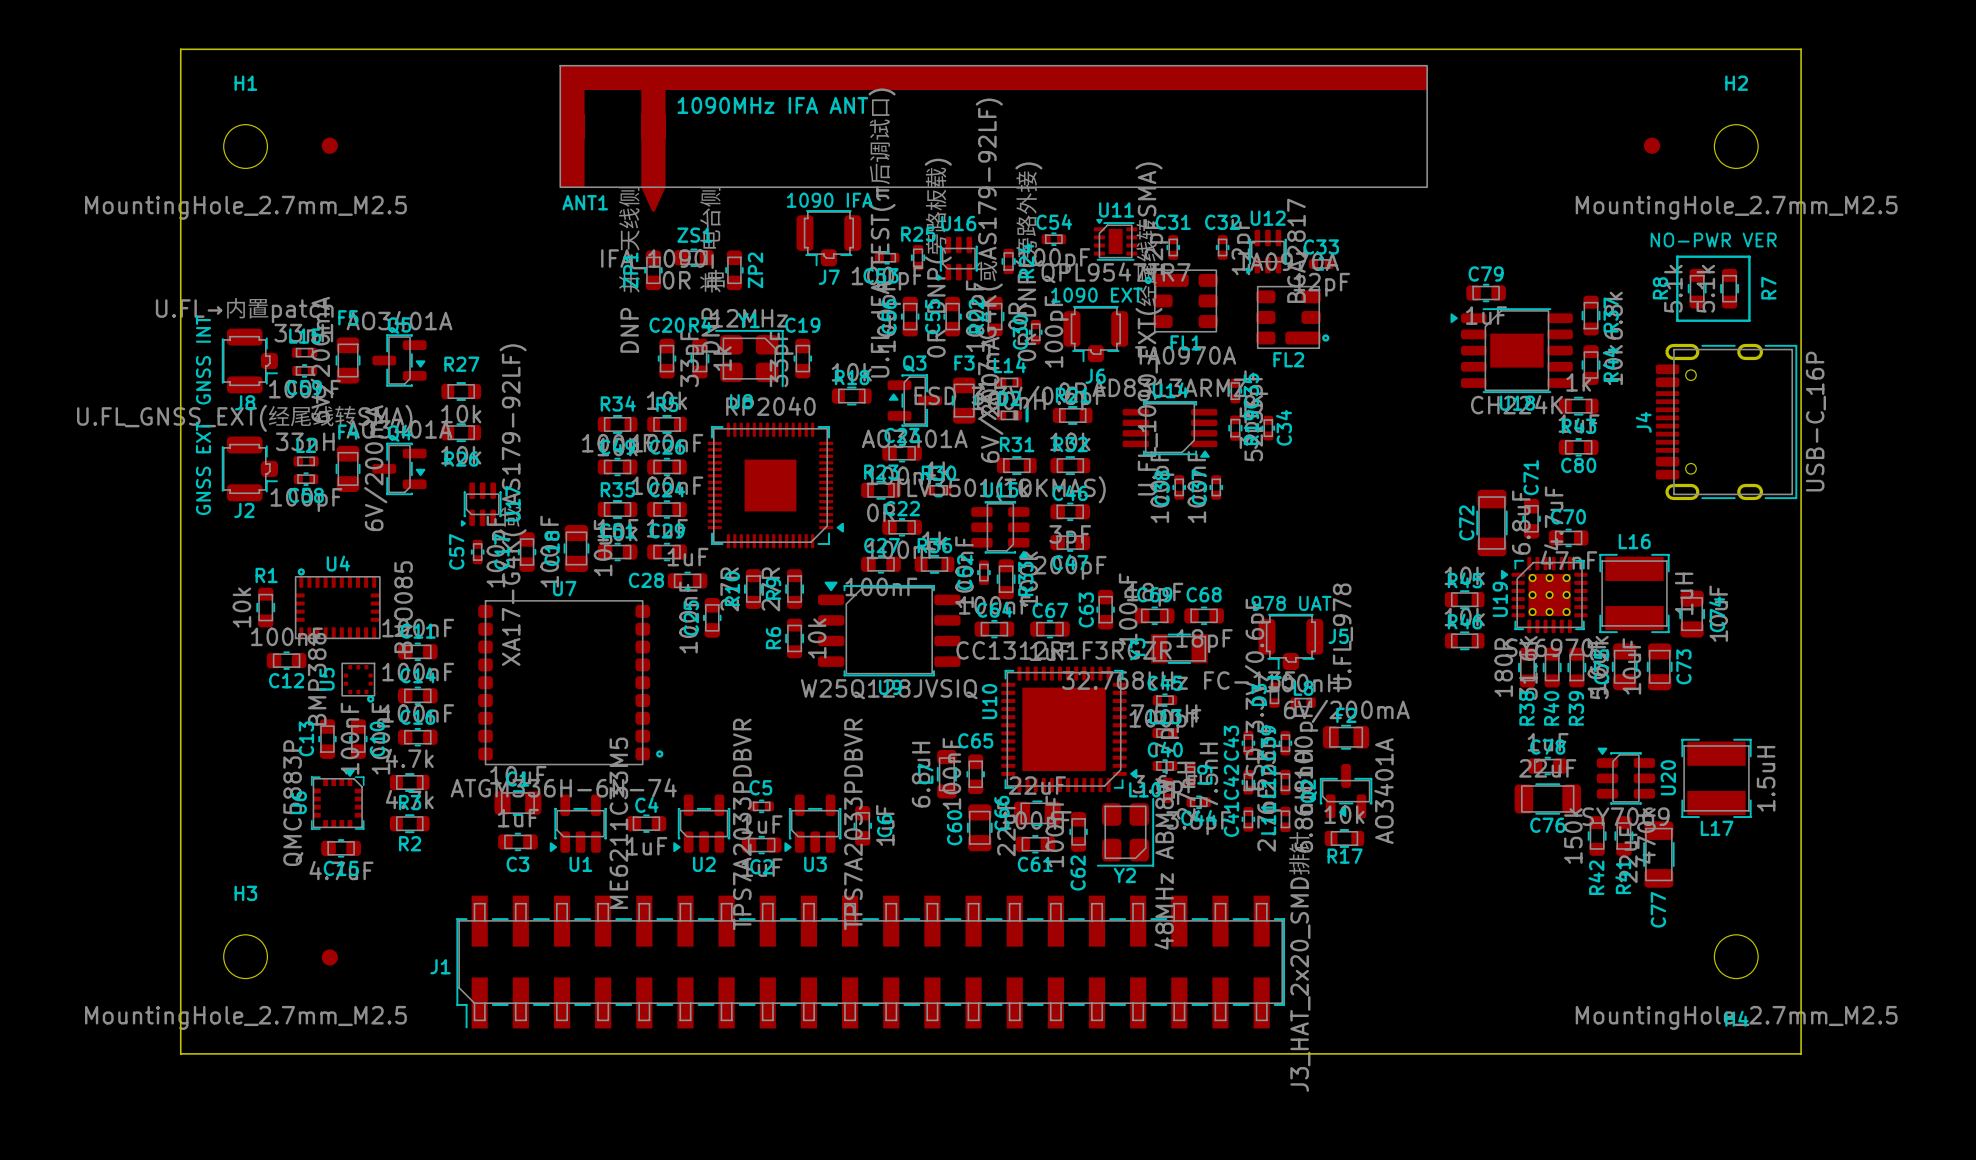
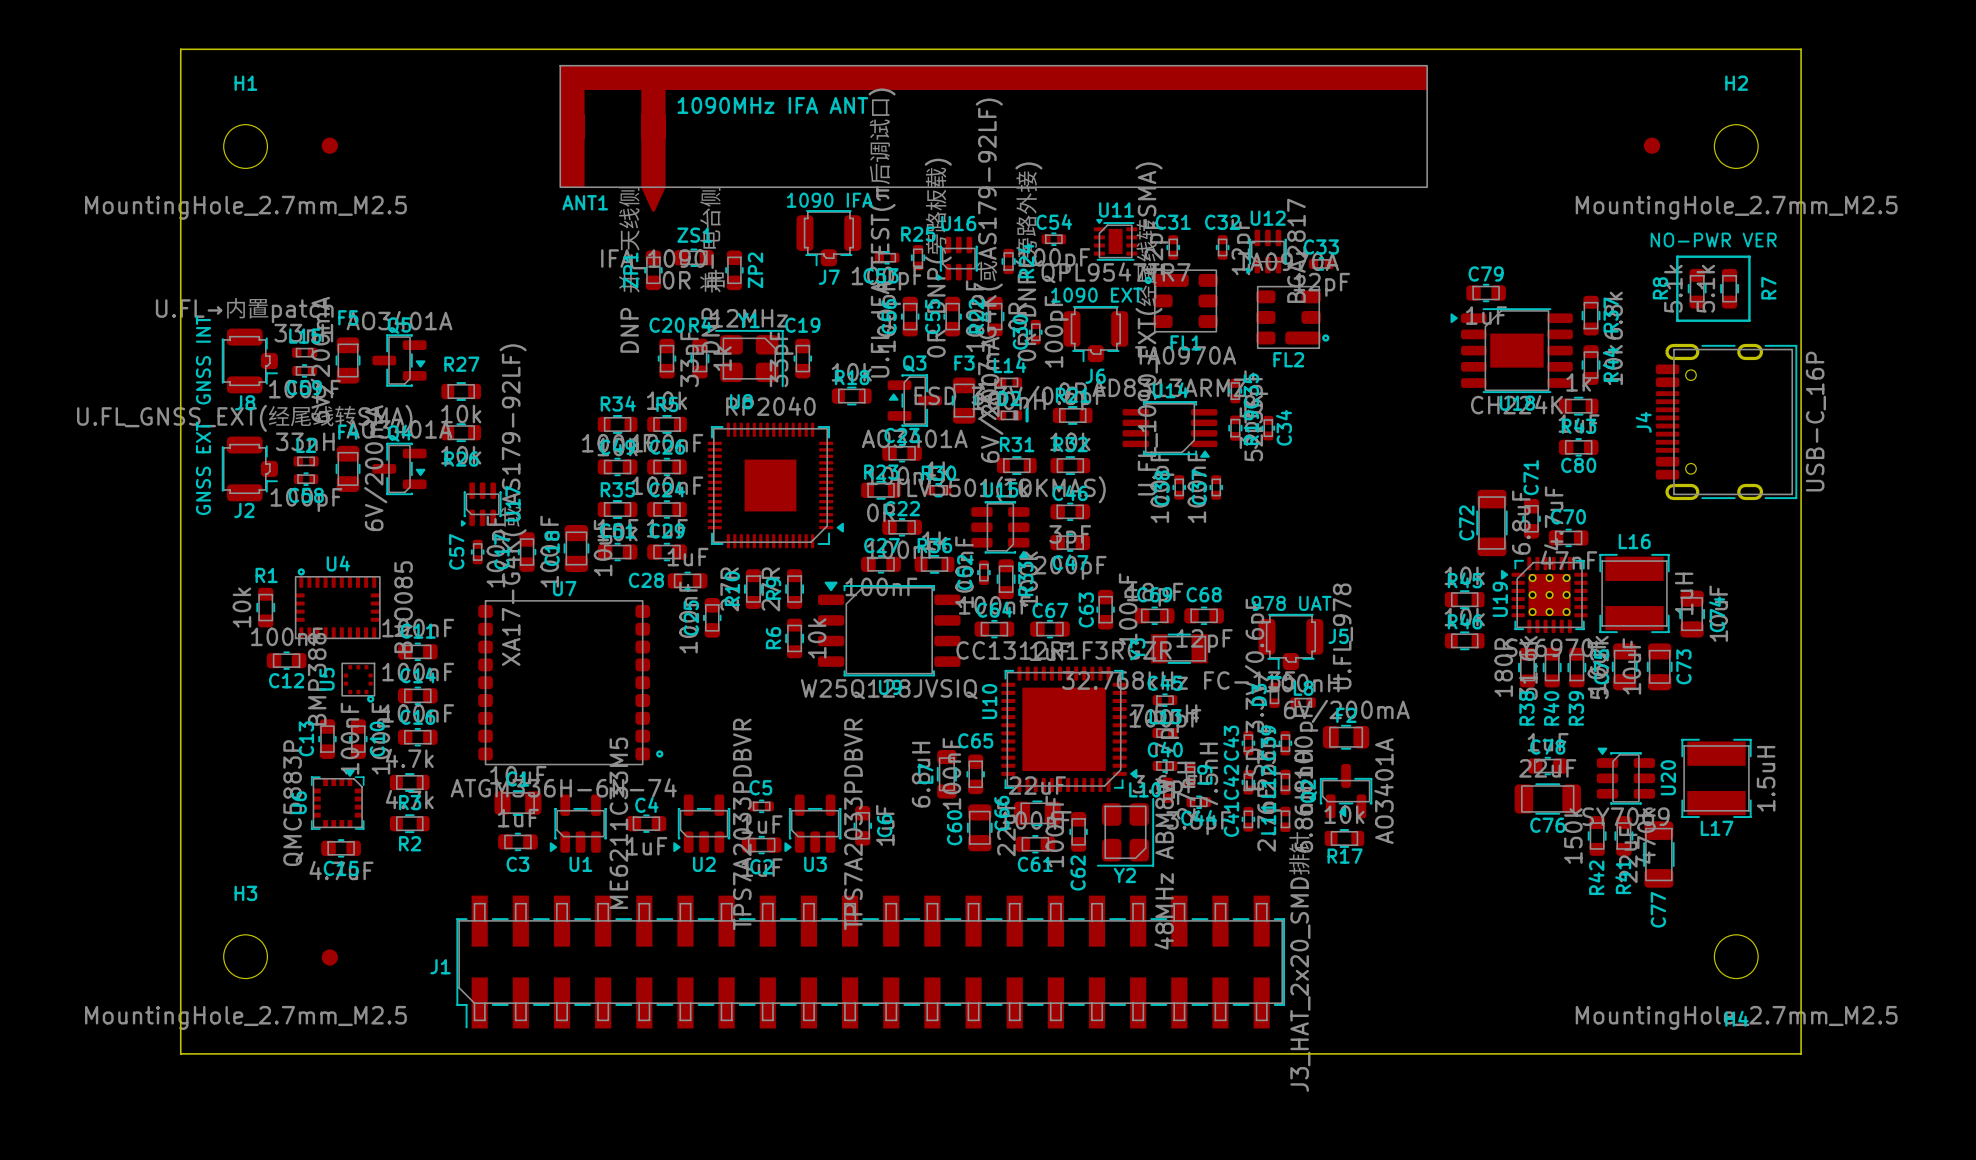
C68 value: 18pF (1204, 641) -> 12pF (1204, 641)

